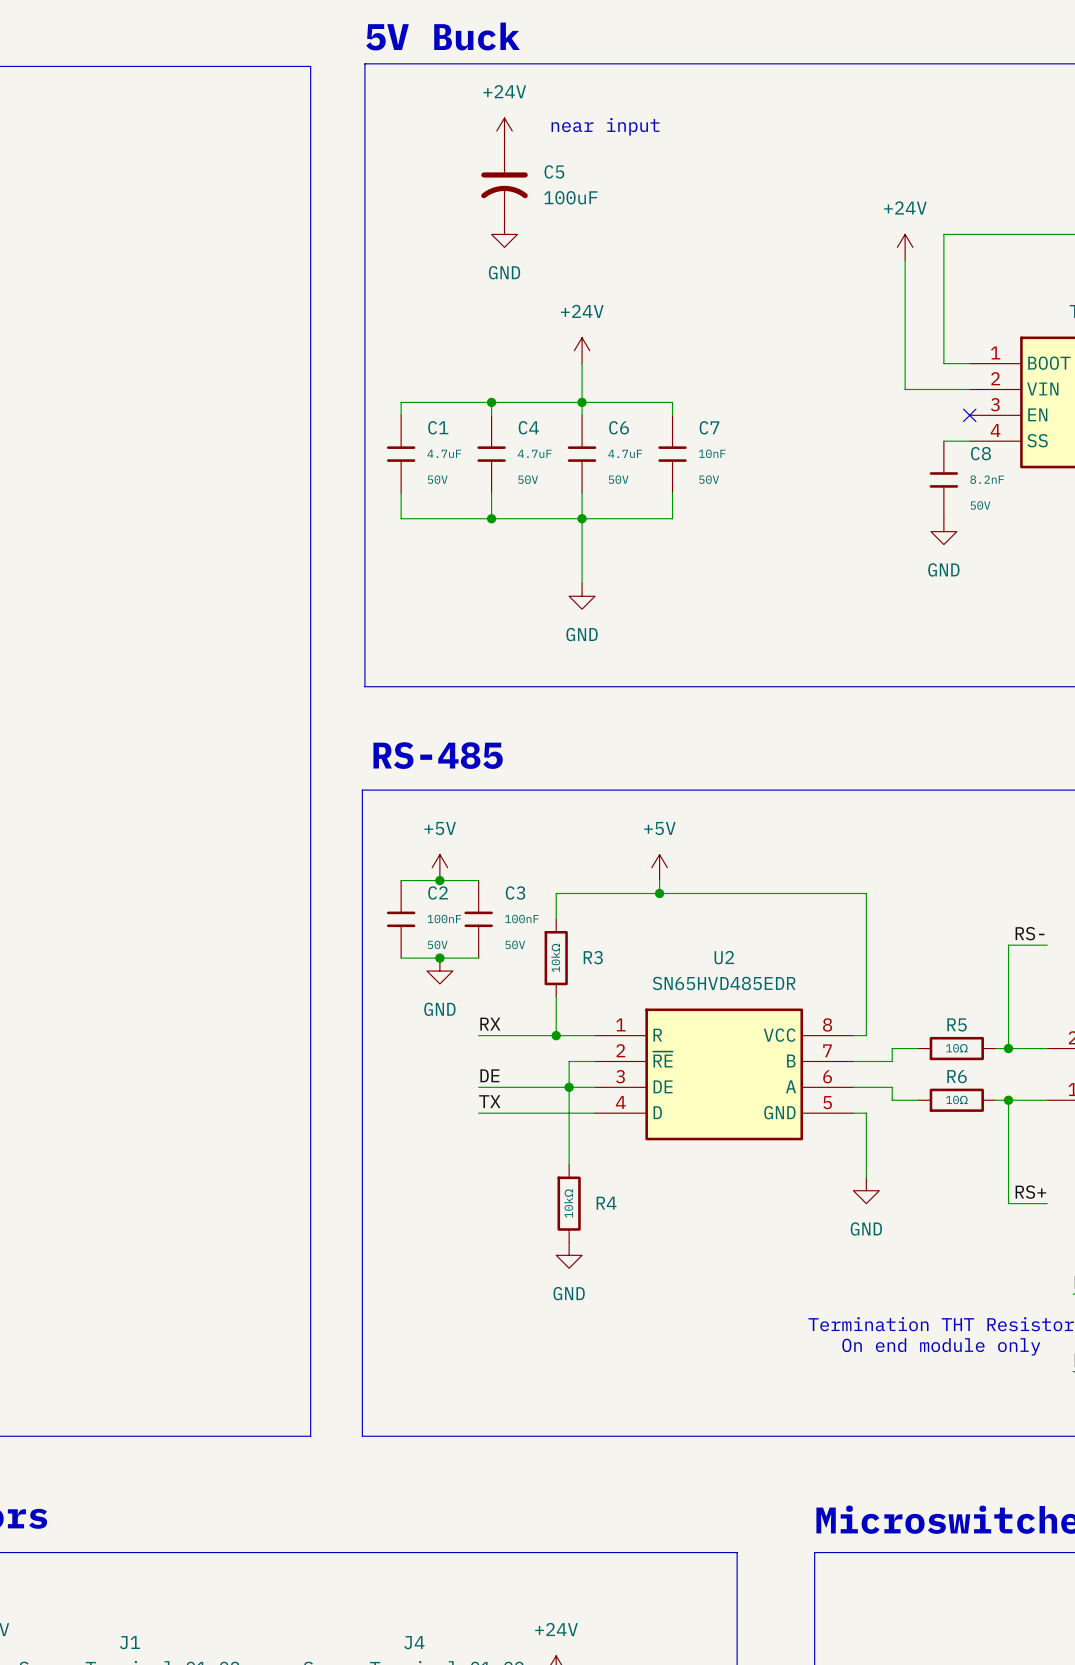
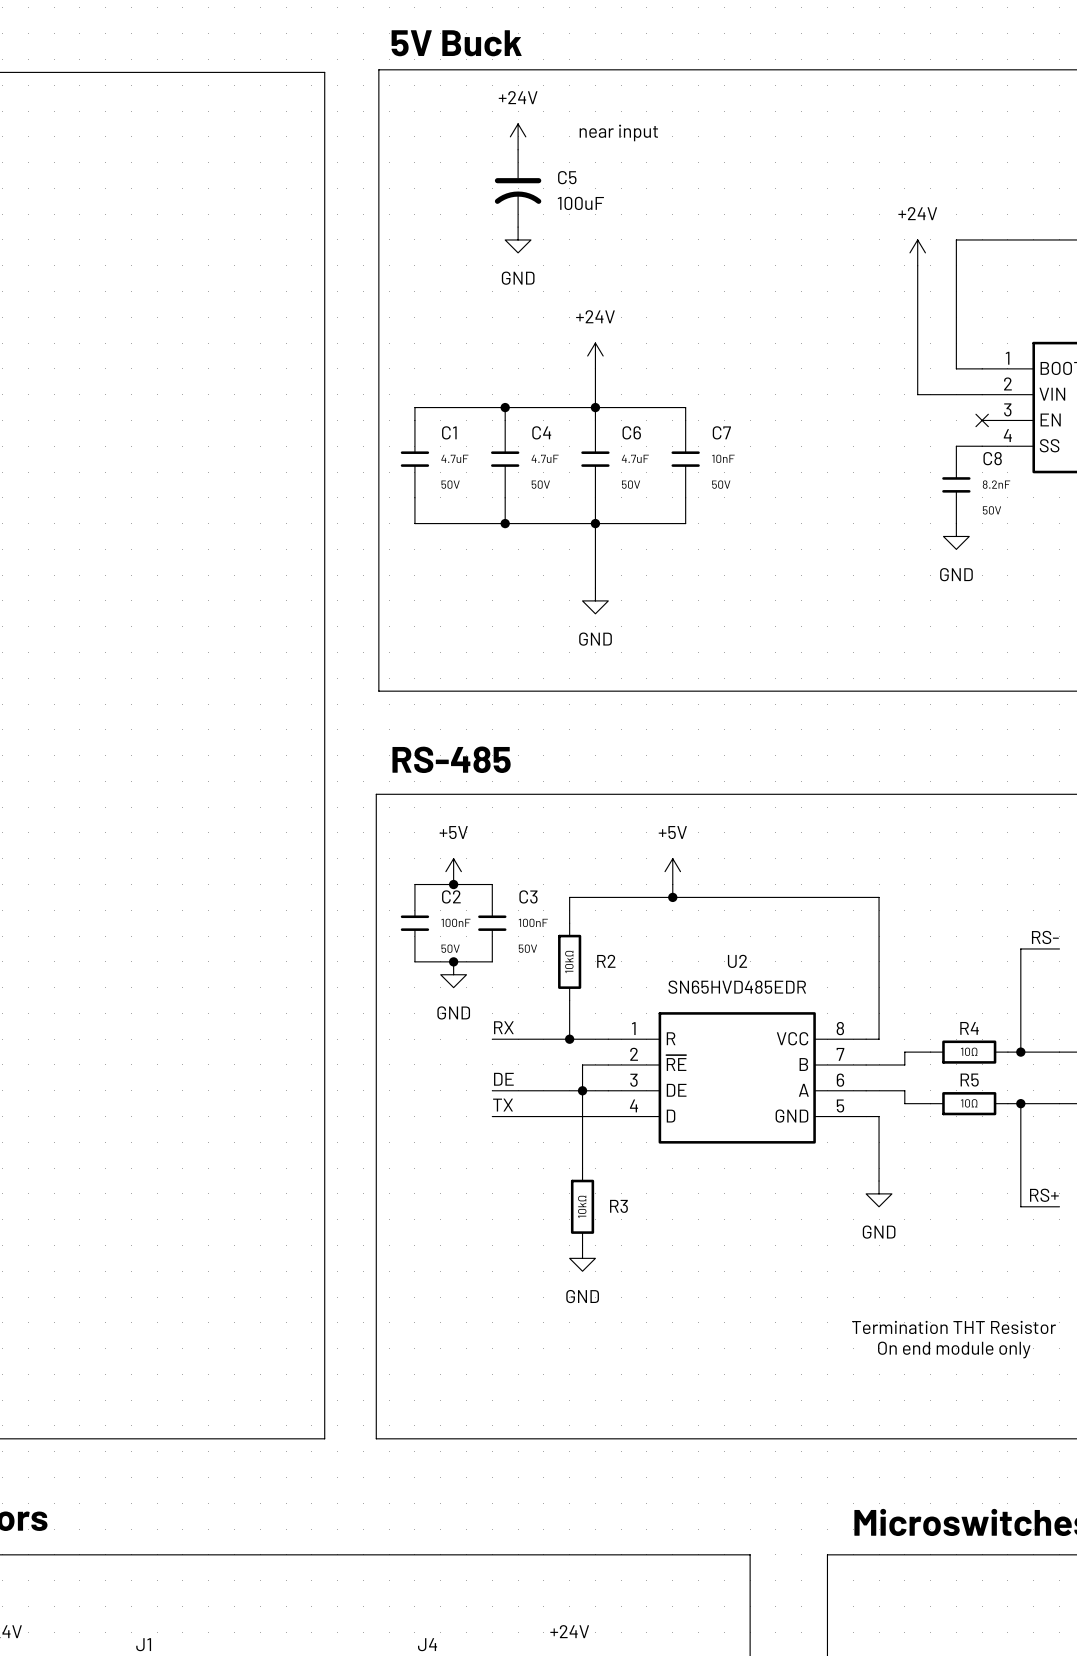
R3 name: R3 (593, 957) -> R2 (606, 961)
R5 name: R5 (957, 1024) -> R4 (969, 1028)
R6 name: R6 (957, 1076) -> R5 (969, 1080)
R4 name: R4 (606, 1203) -> R3 (618, 1206)

